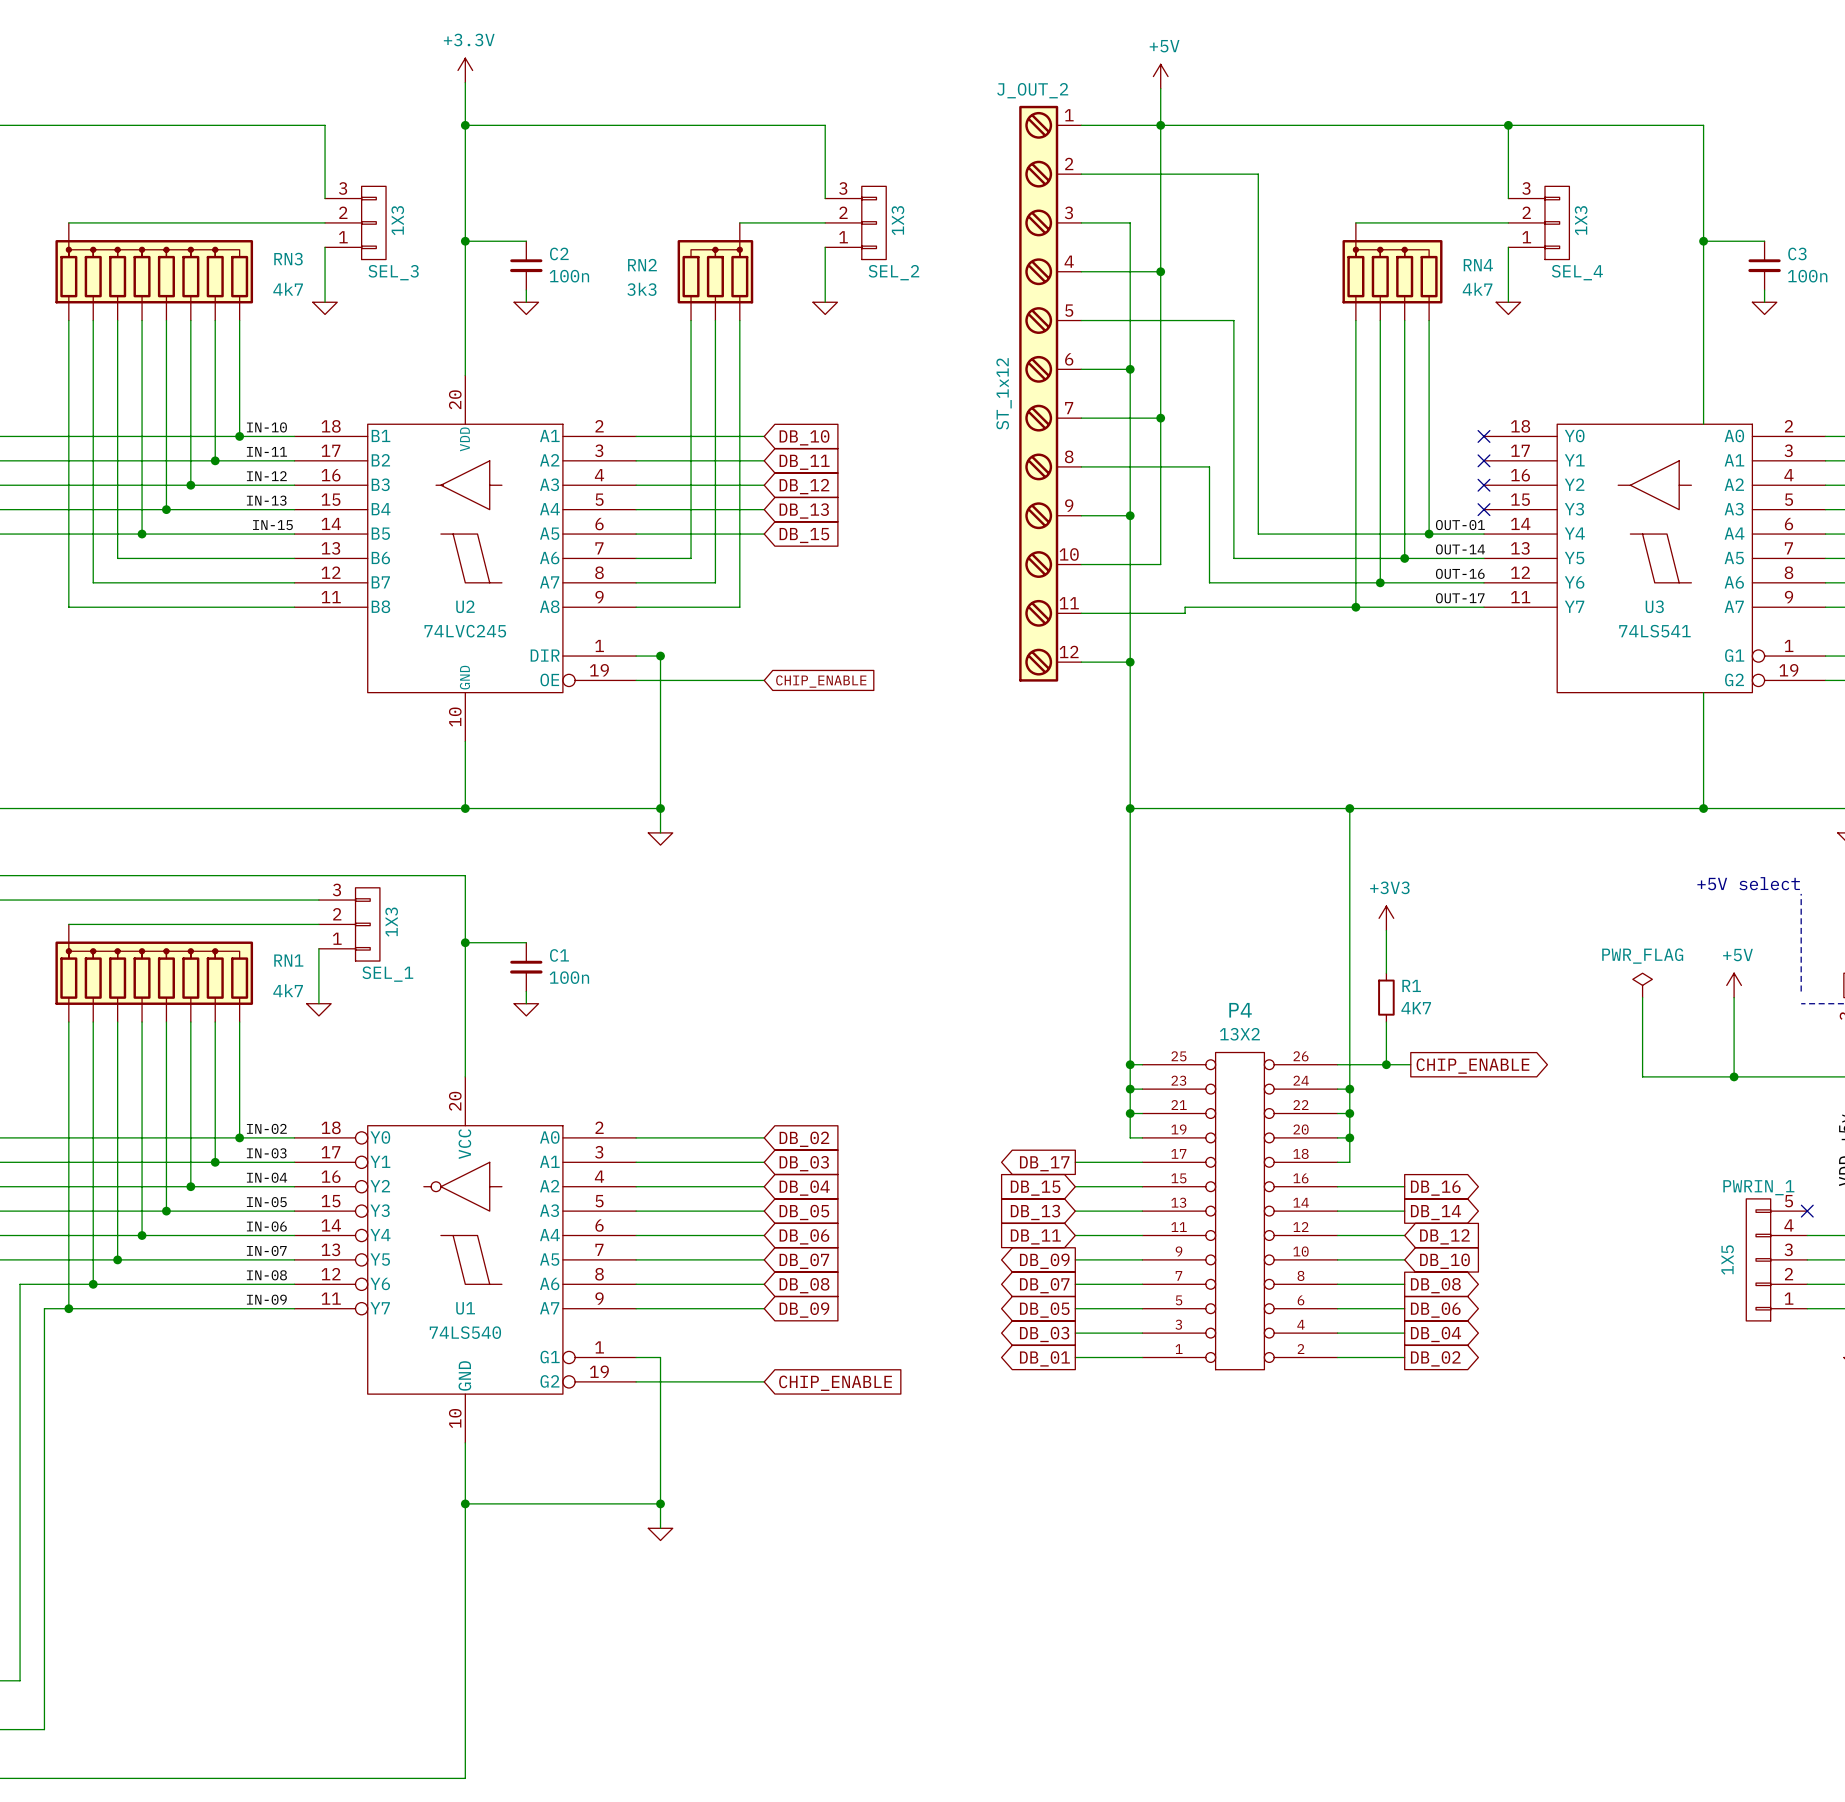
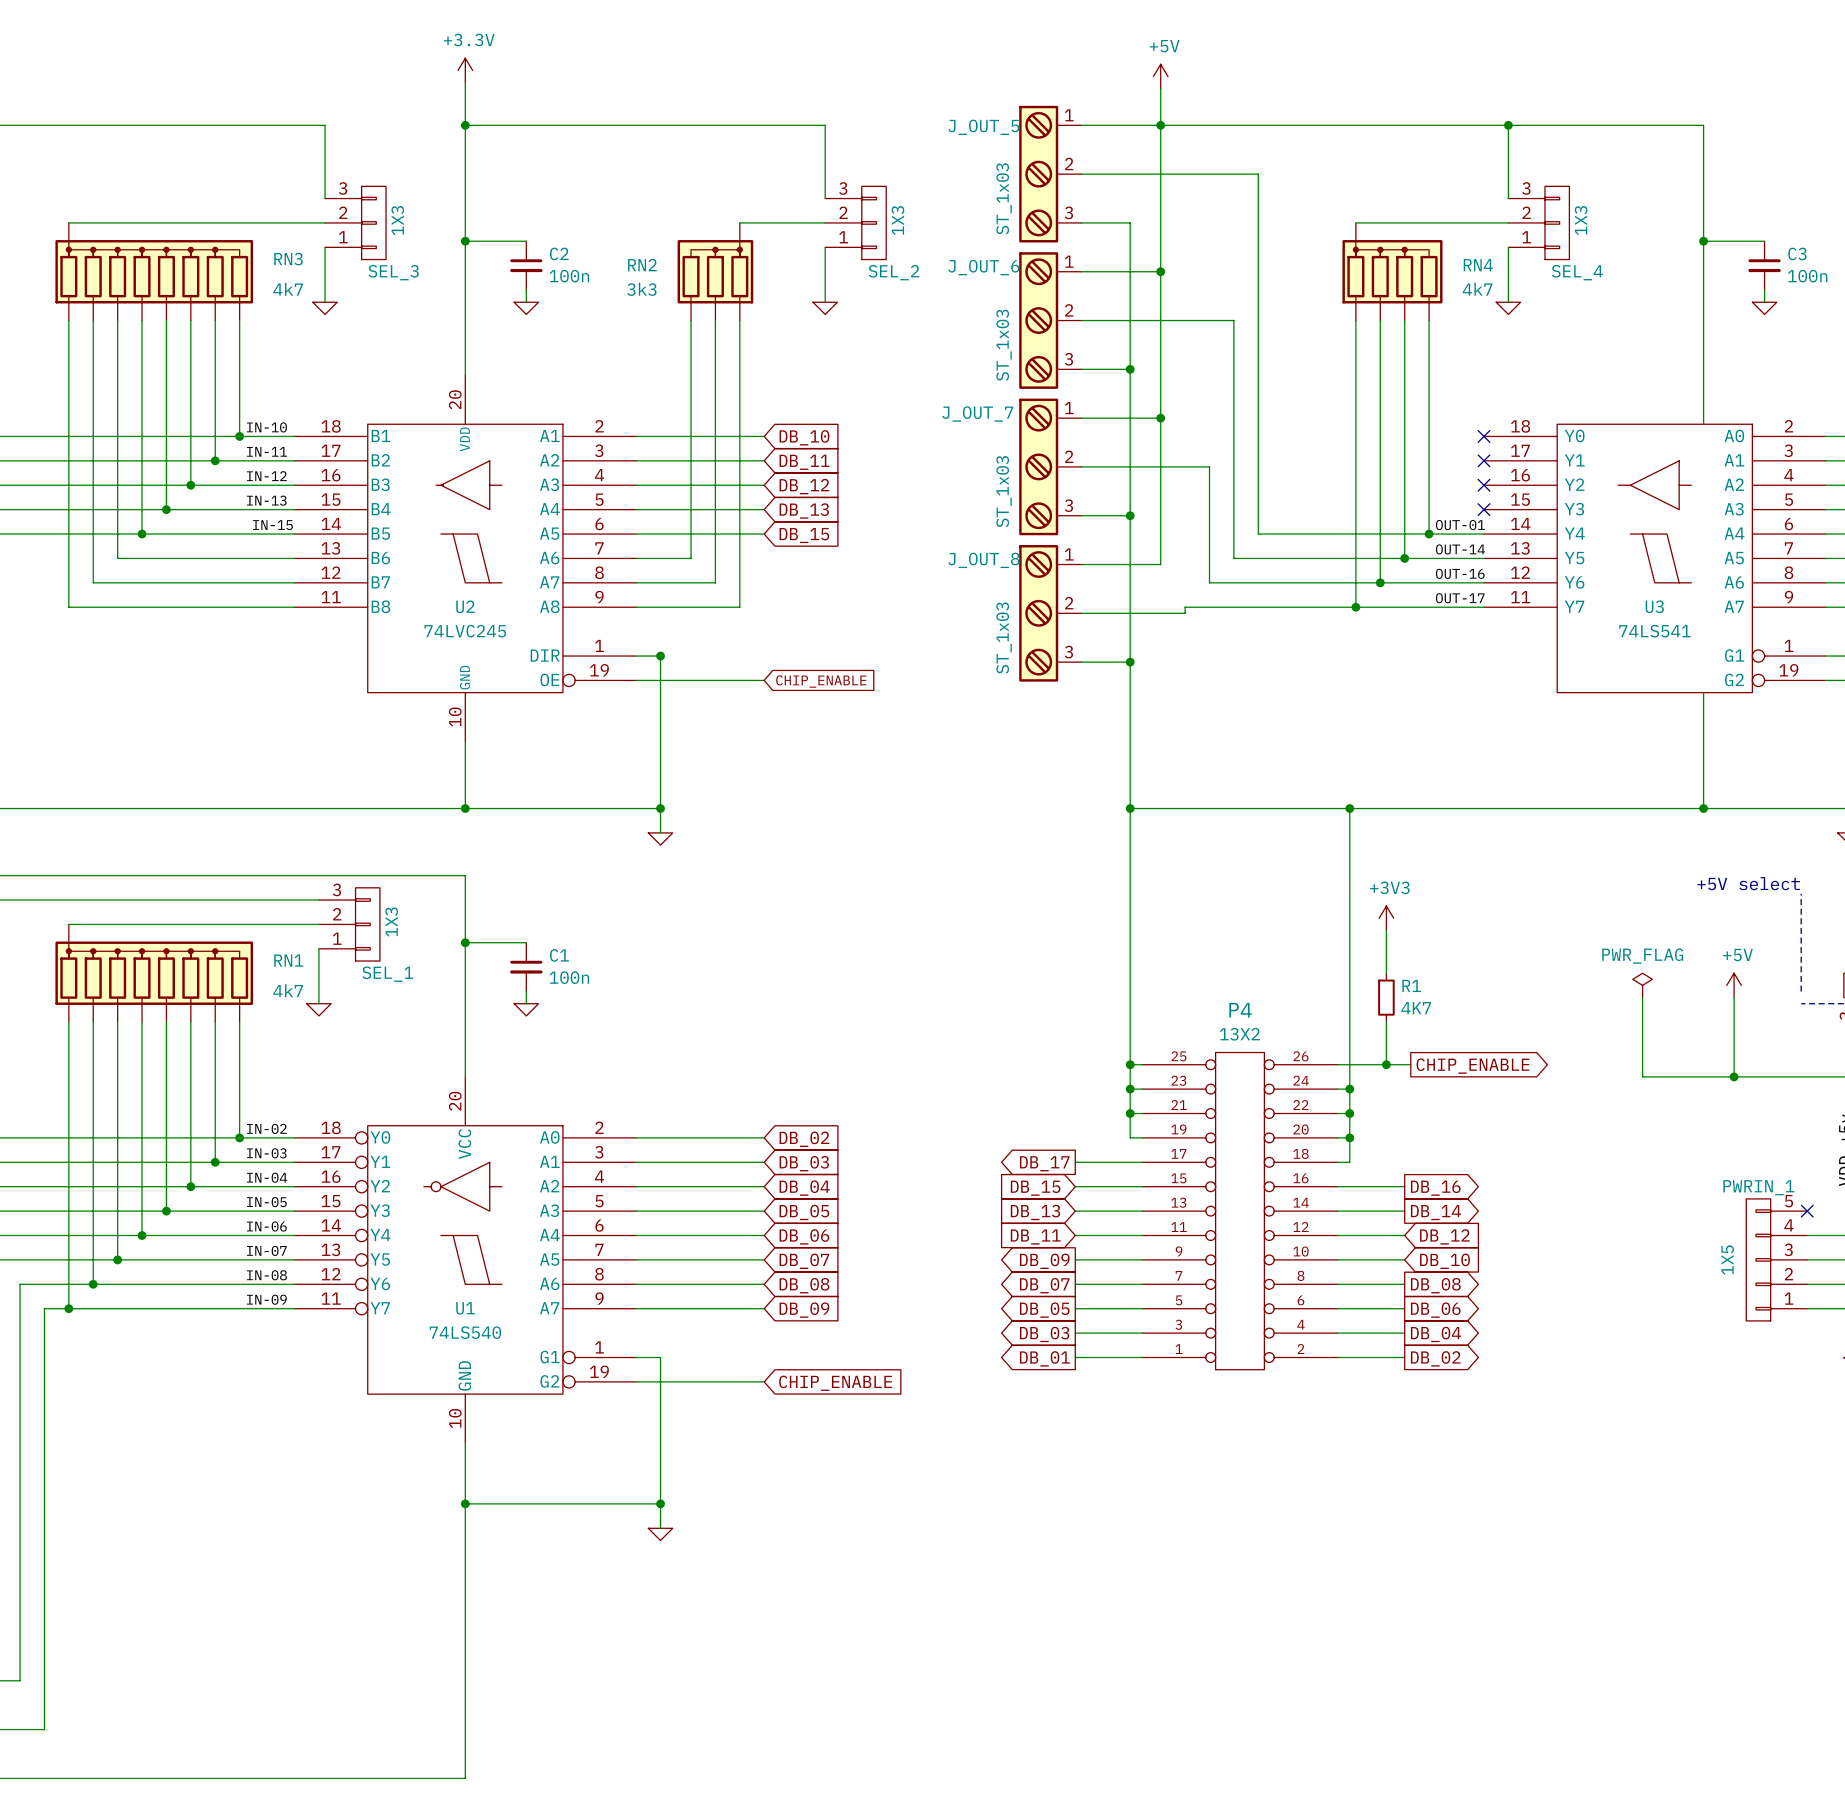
J_OUT_5: none -> ST_1x03 (1050, 174)
J_OUT_6: none -> ST_1x03 (1050, 320)
J_OUT_2: ST_1x12 (1050, 393) -> none
J_OUT_7: none -> ST_1x03 (1050, 466)
J_OUT_8: none -> ST_1x03 (1050, 613)

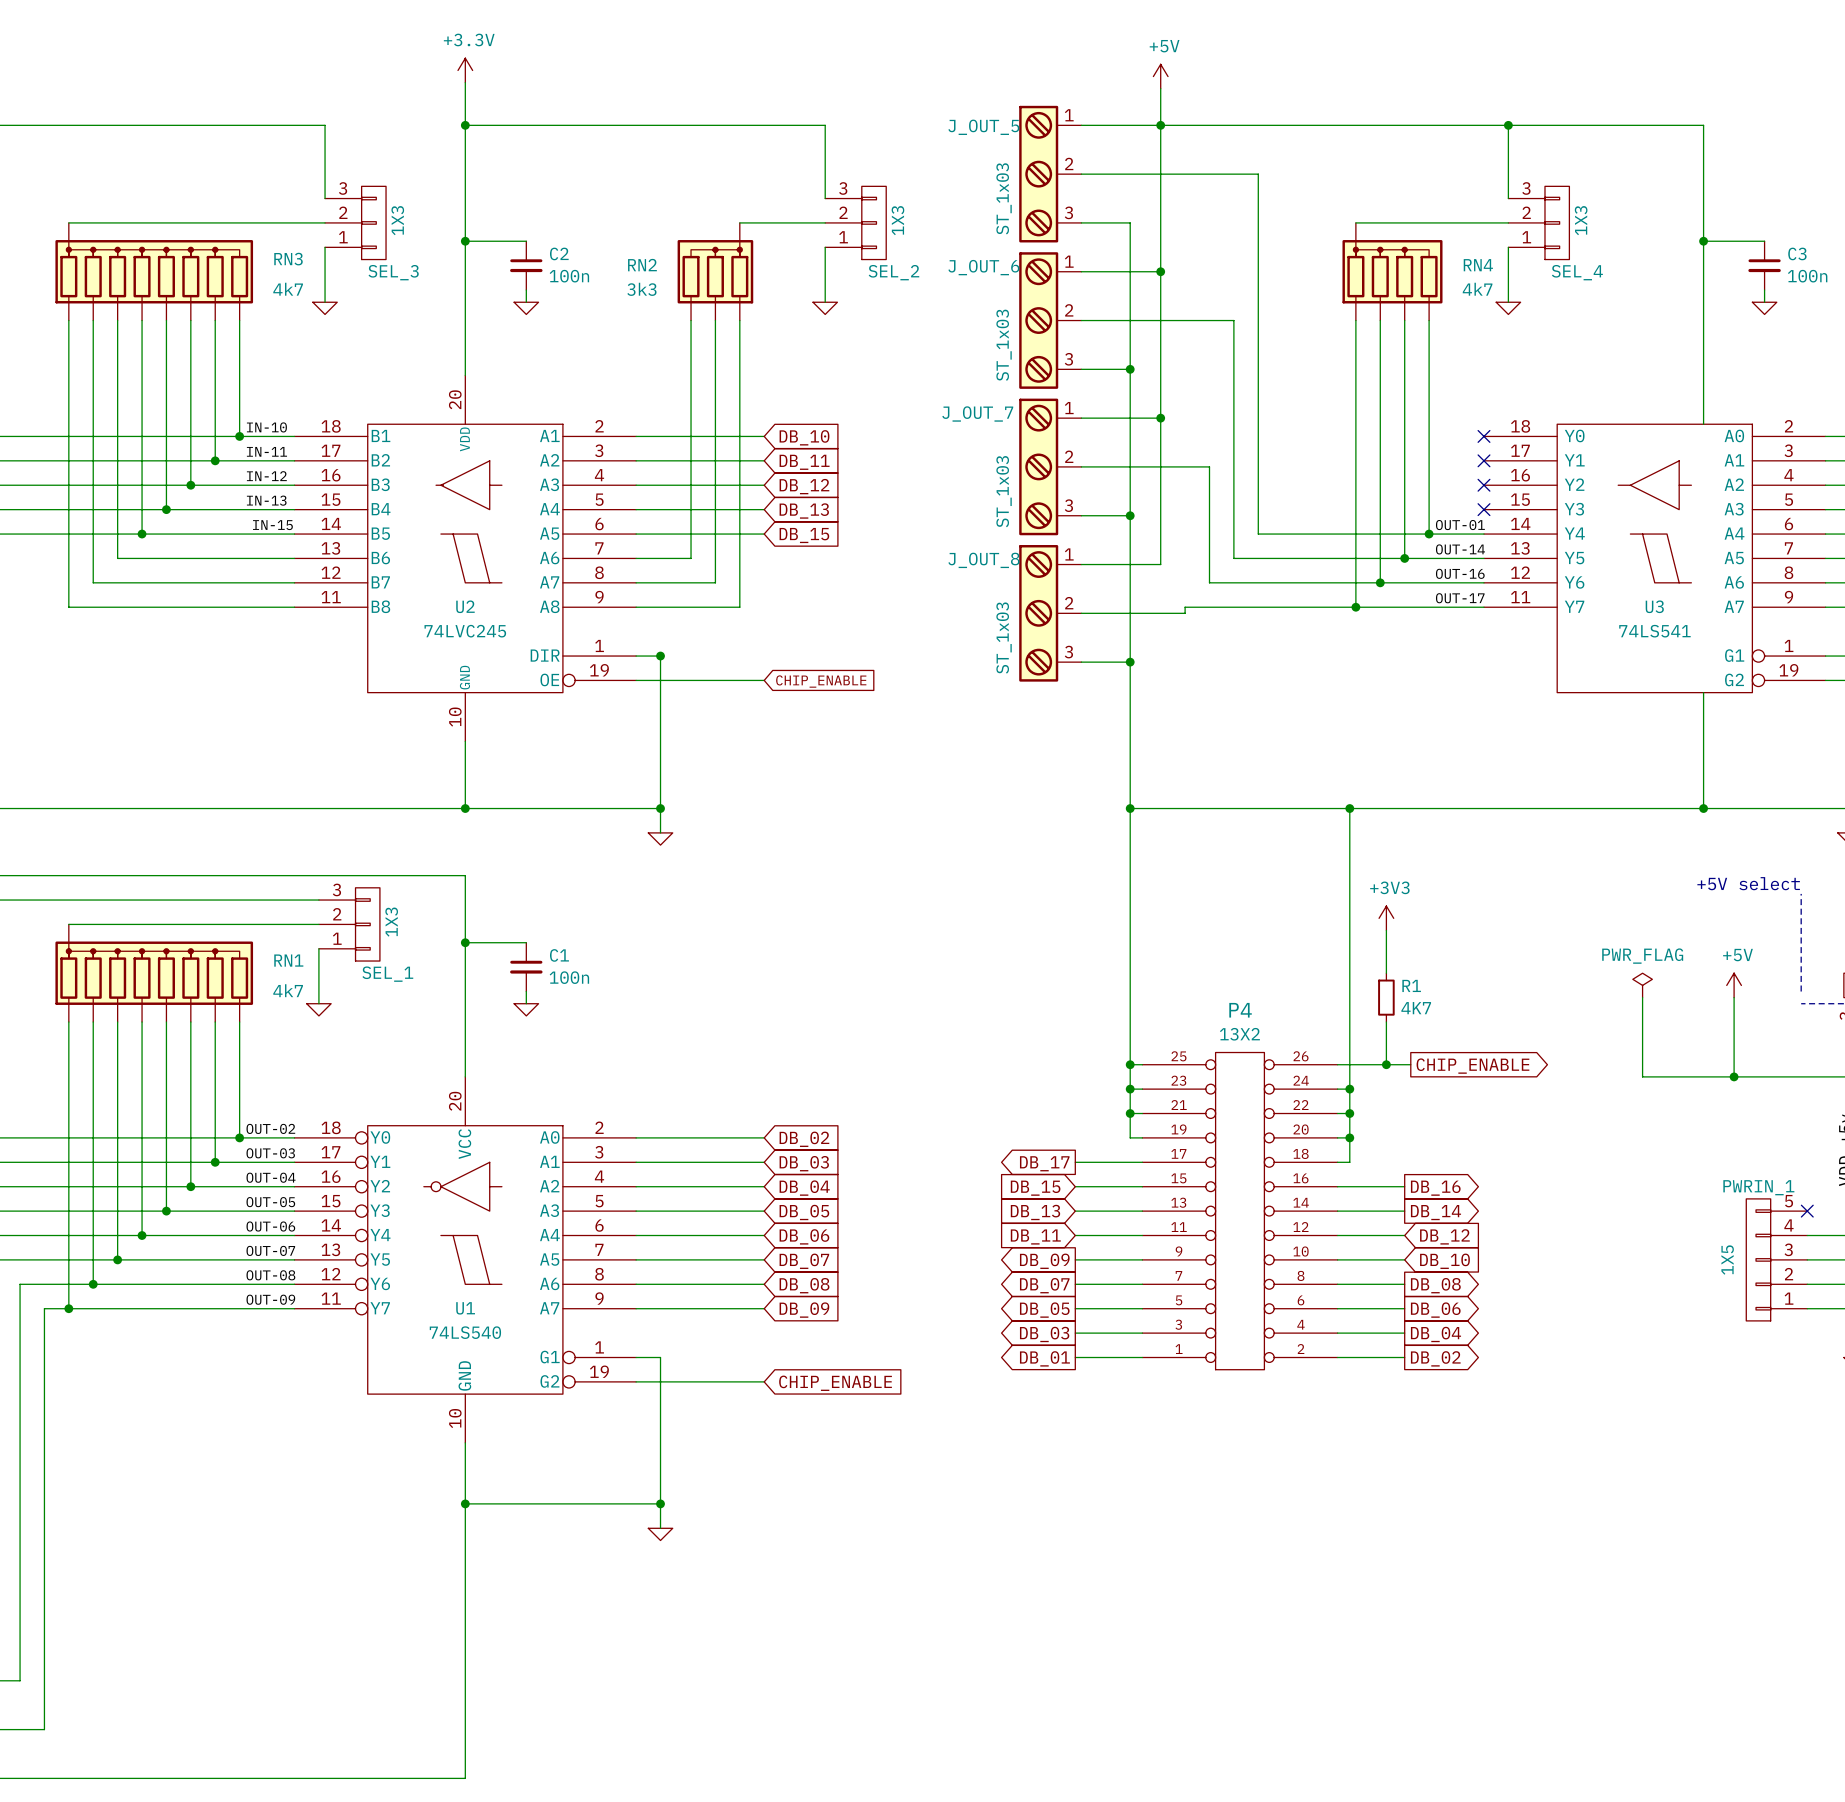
label: IN-02 (266, 1128) -> OUT-02 (270, 1128)
label: IN-03 (266, 1153) -> OUT-03 (270, 1153)
label: IN-04 (267, 1177) -> OUT-04 (271, 1177)
label: IN-05 (266, 1202) -> OUT-05 (270, 1202)
label: IN-06 (266, 1226) -> OUT-06 (270, 1226)
label: IN-07 (266, 1250) -> OUT-07 (270, 1250)
label: IN-08 (266, 1275) -> OUT-08 (270, 1275)
label: IN-09 (266, 1299) -> OUT-09 (270, 1299)

